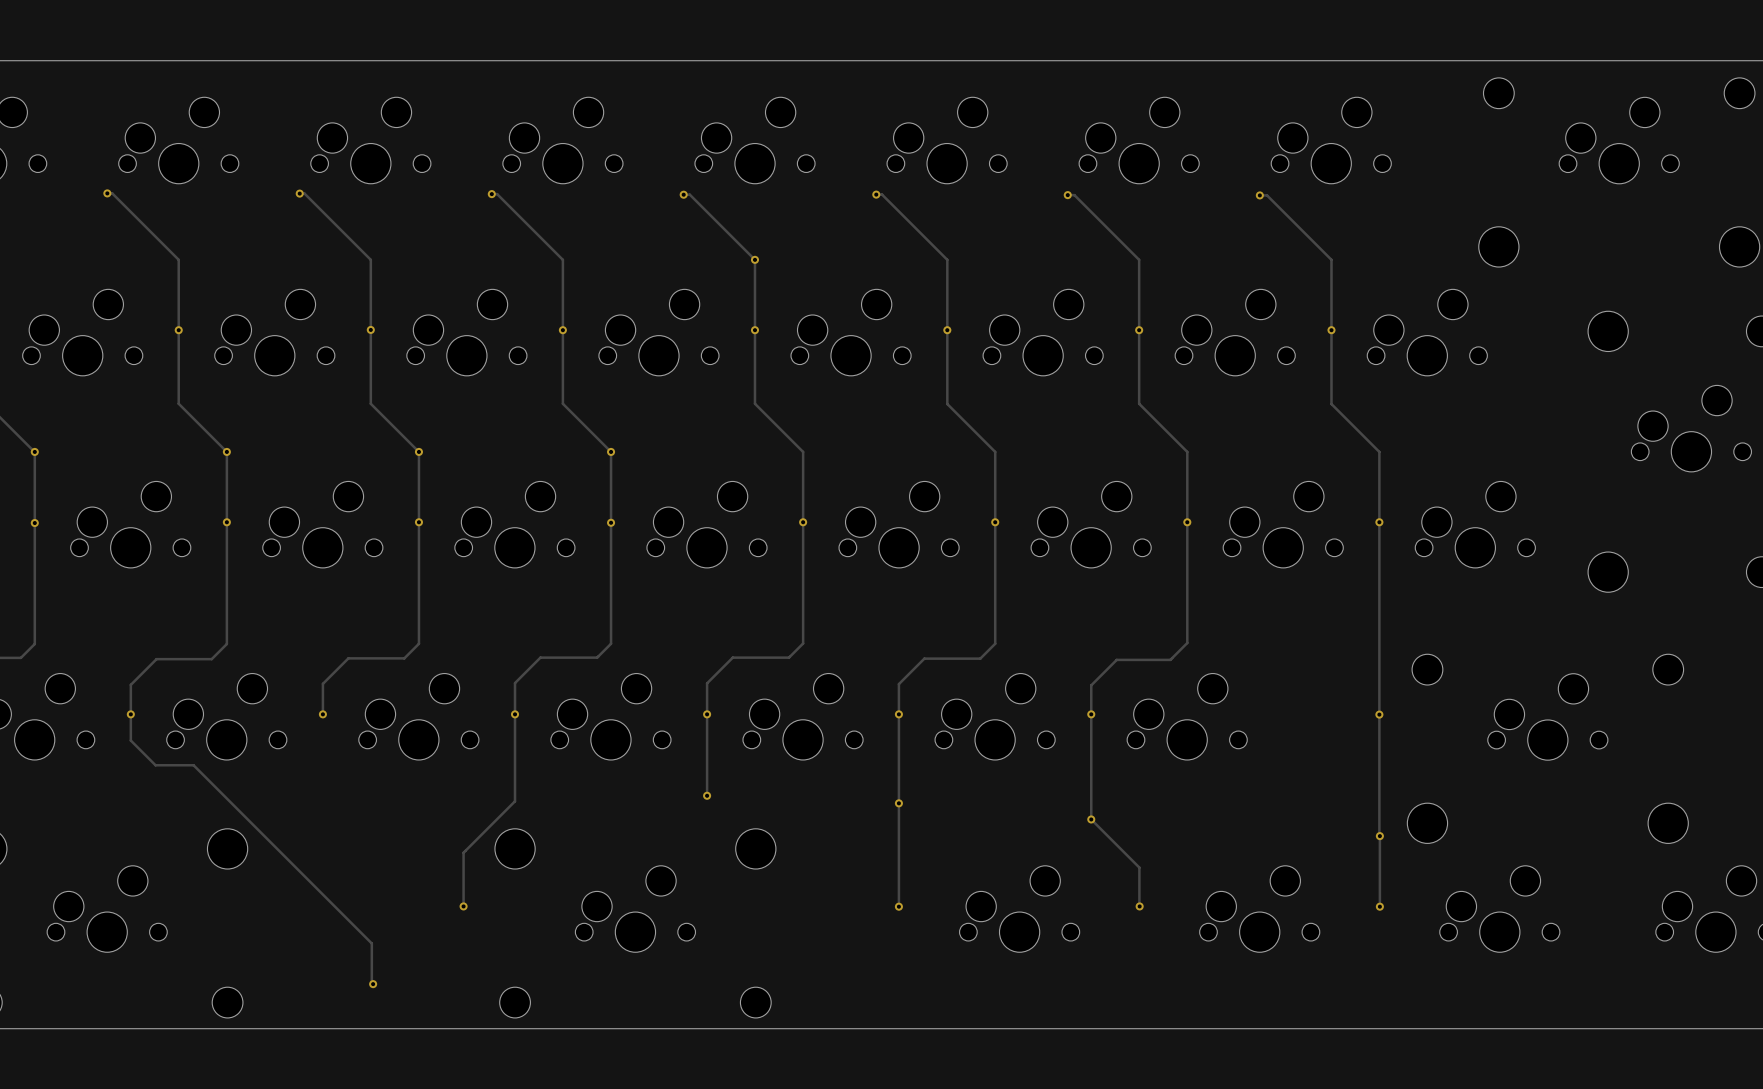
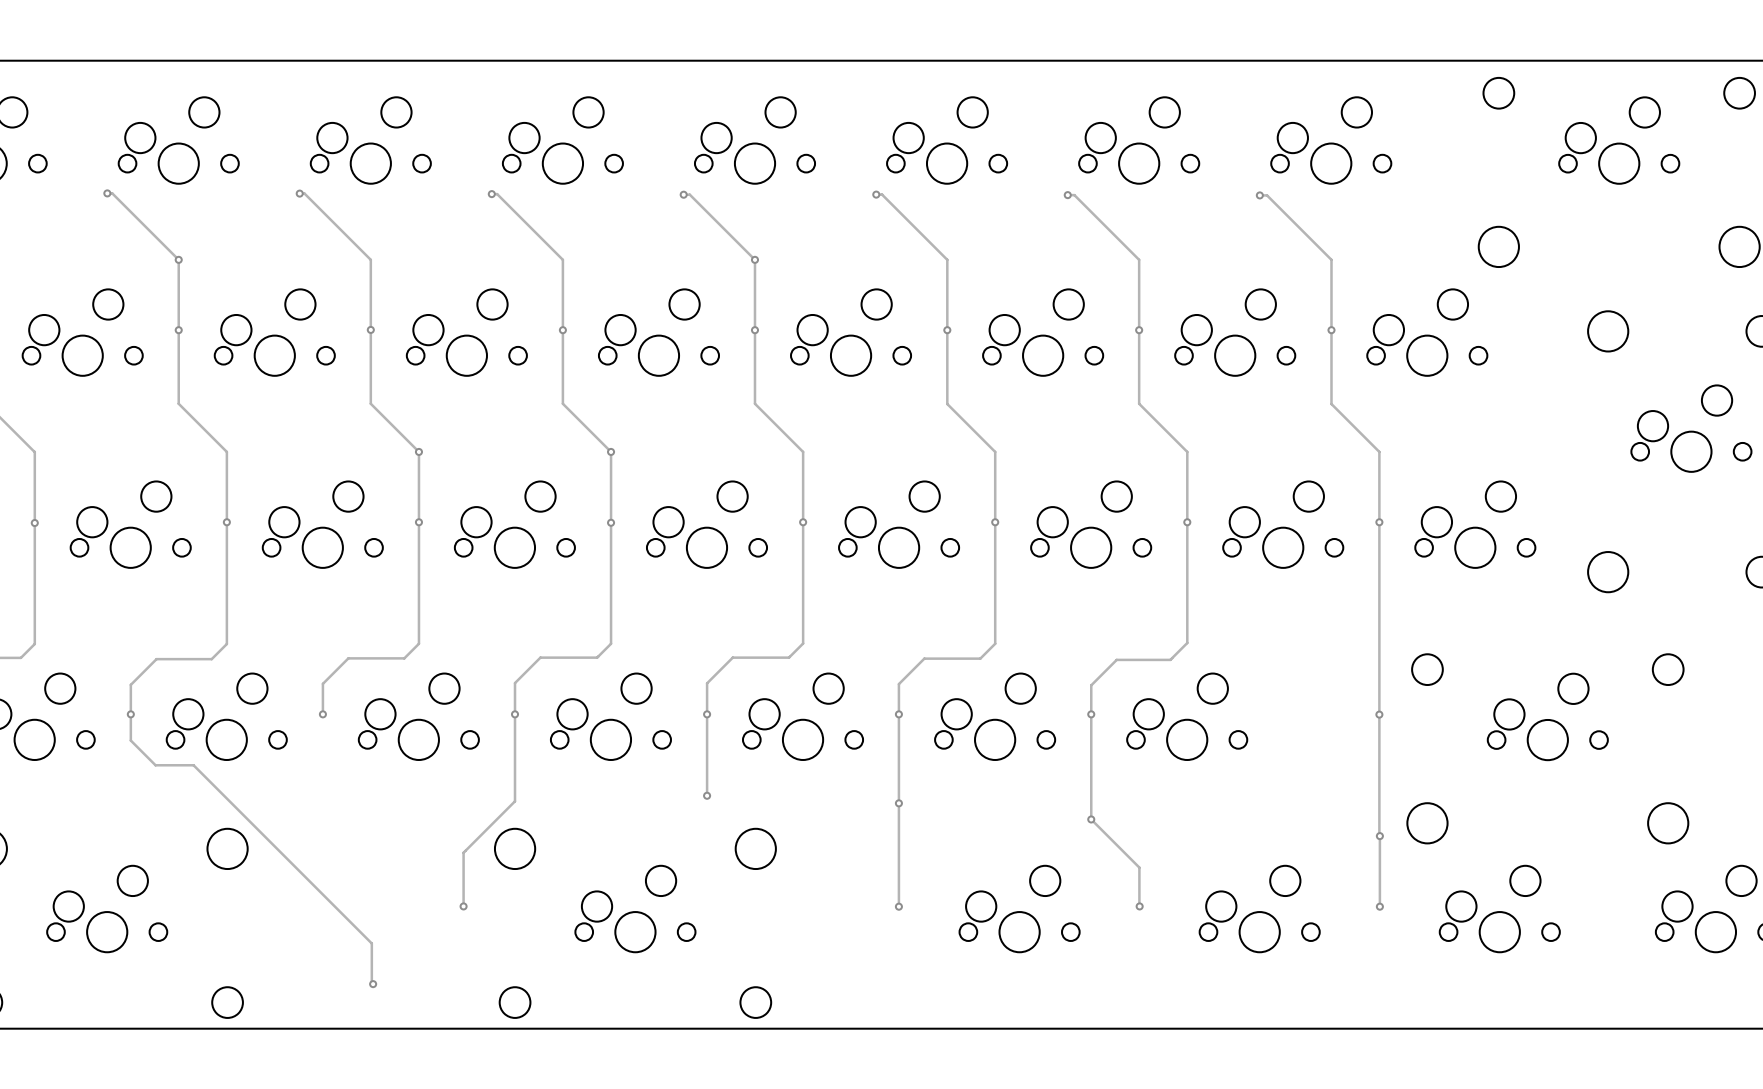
via: none -> (178, 259)
via: (34, 451) -> none
via: (226, 451) -> none

